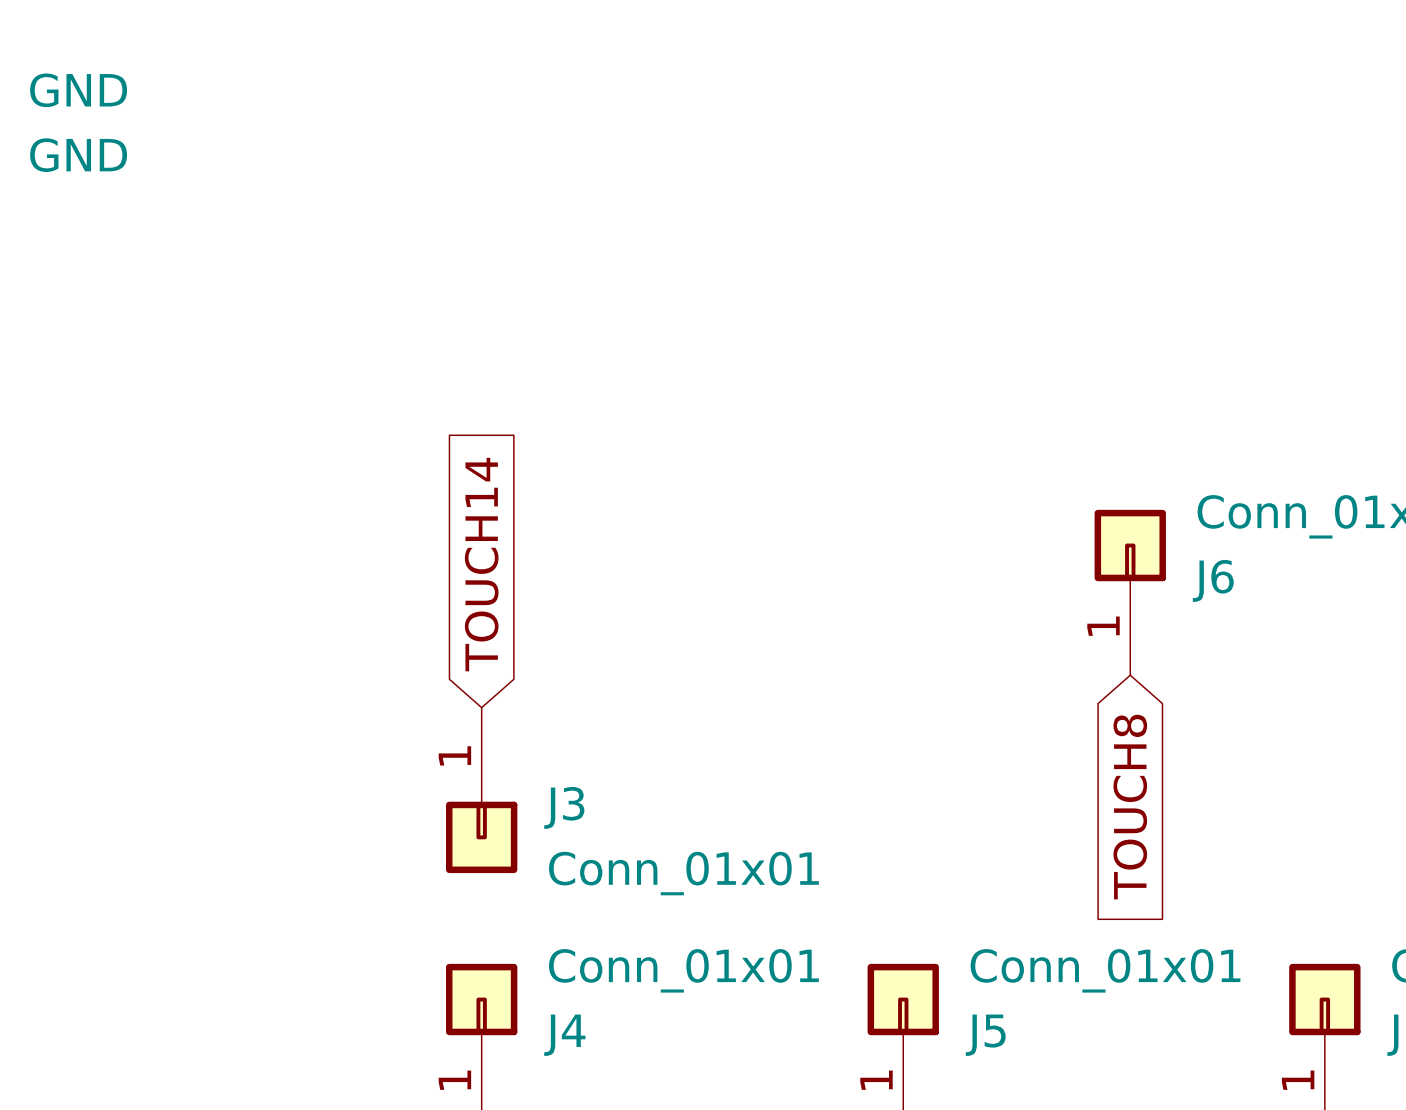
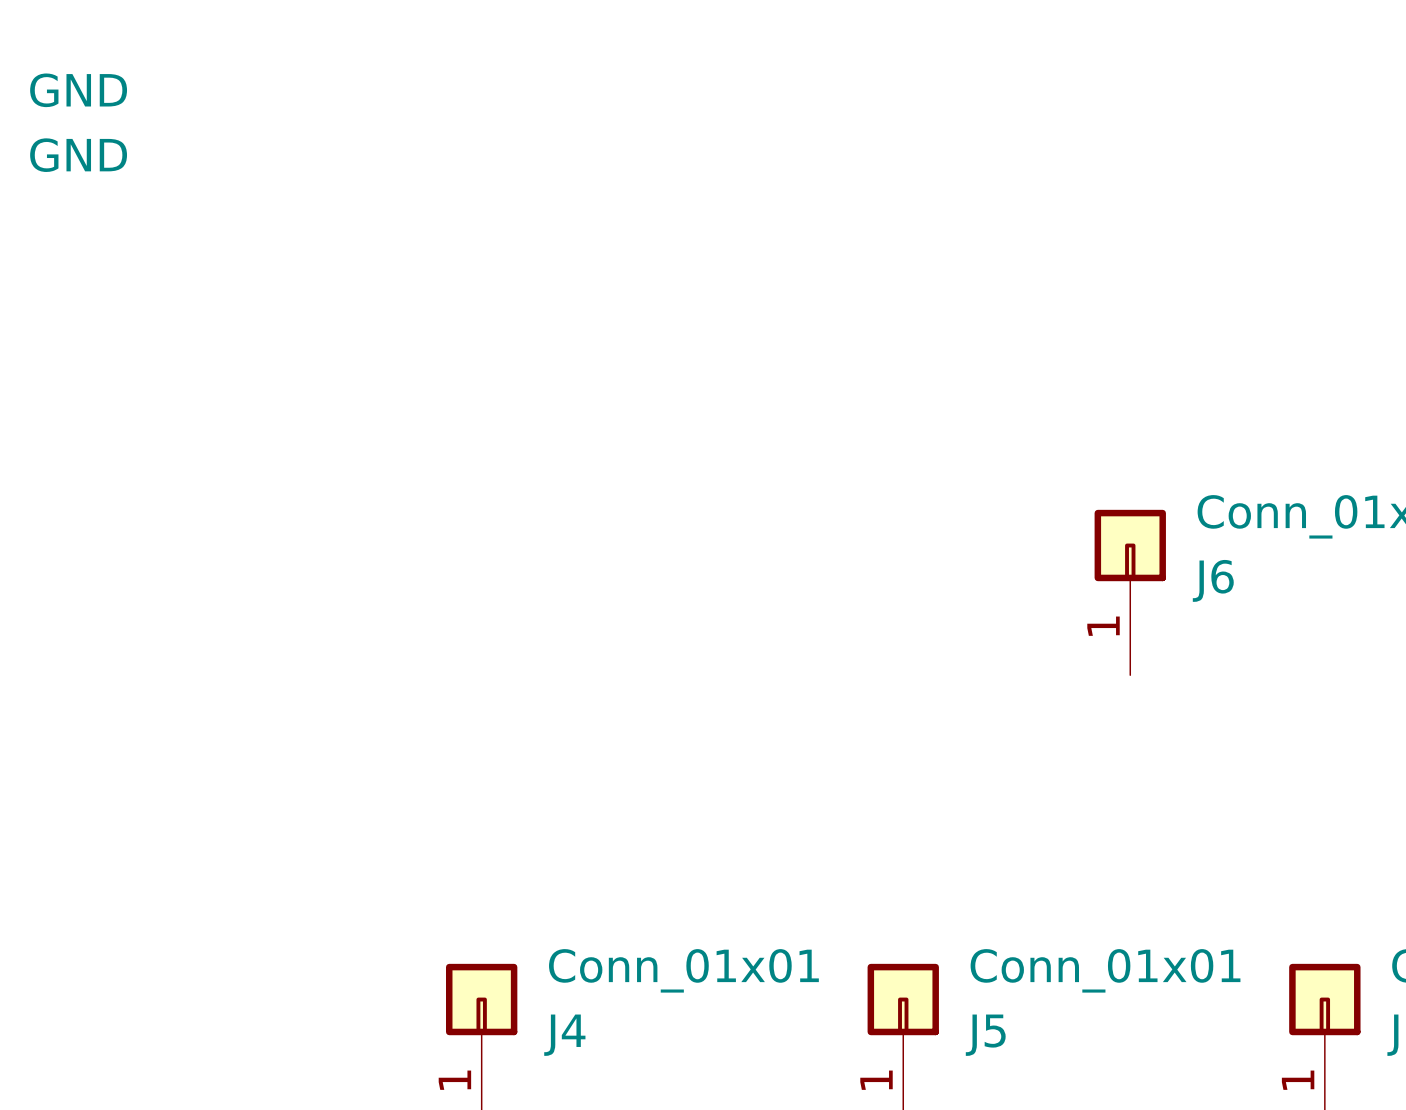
global label: TOUCH14 (481, 564) -> none
J3: Conn_01x01 (481, 790) -> none
global label: TOUCH8 (1130, 807) -> none

